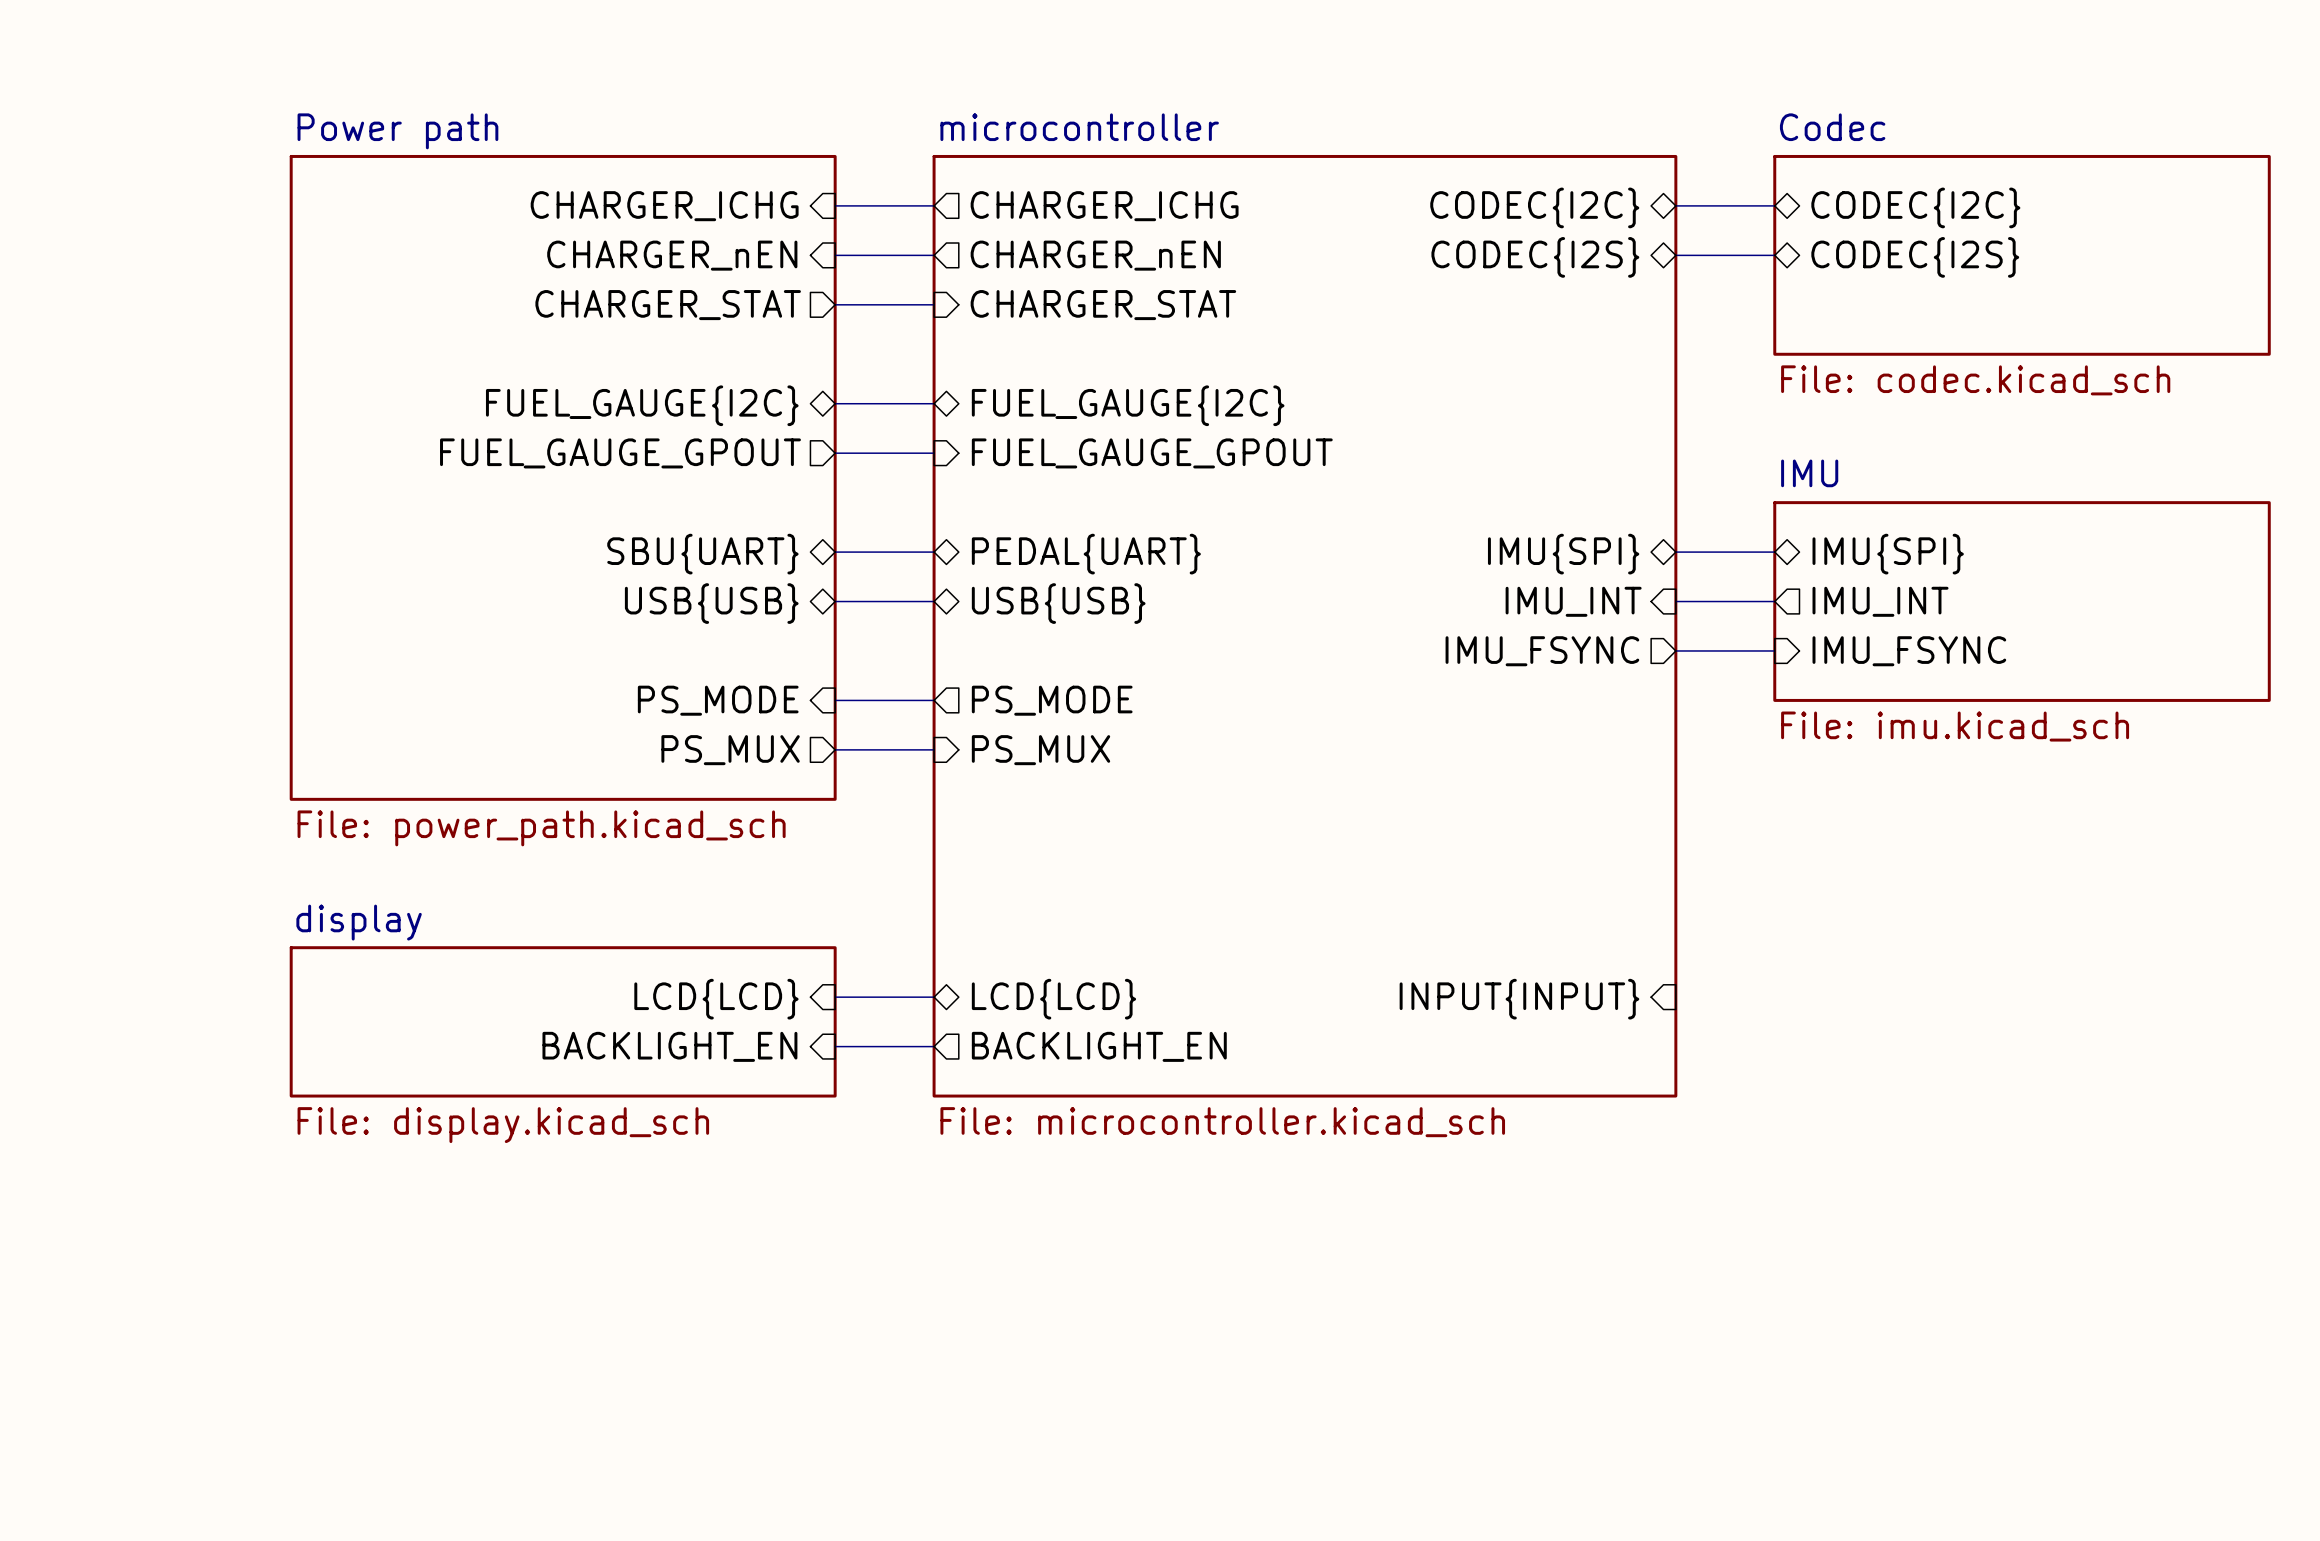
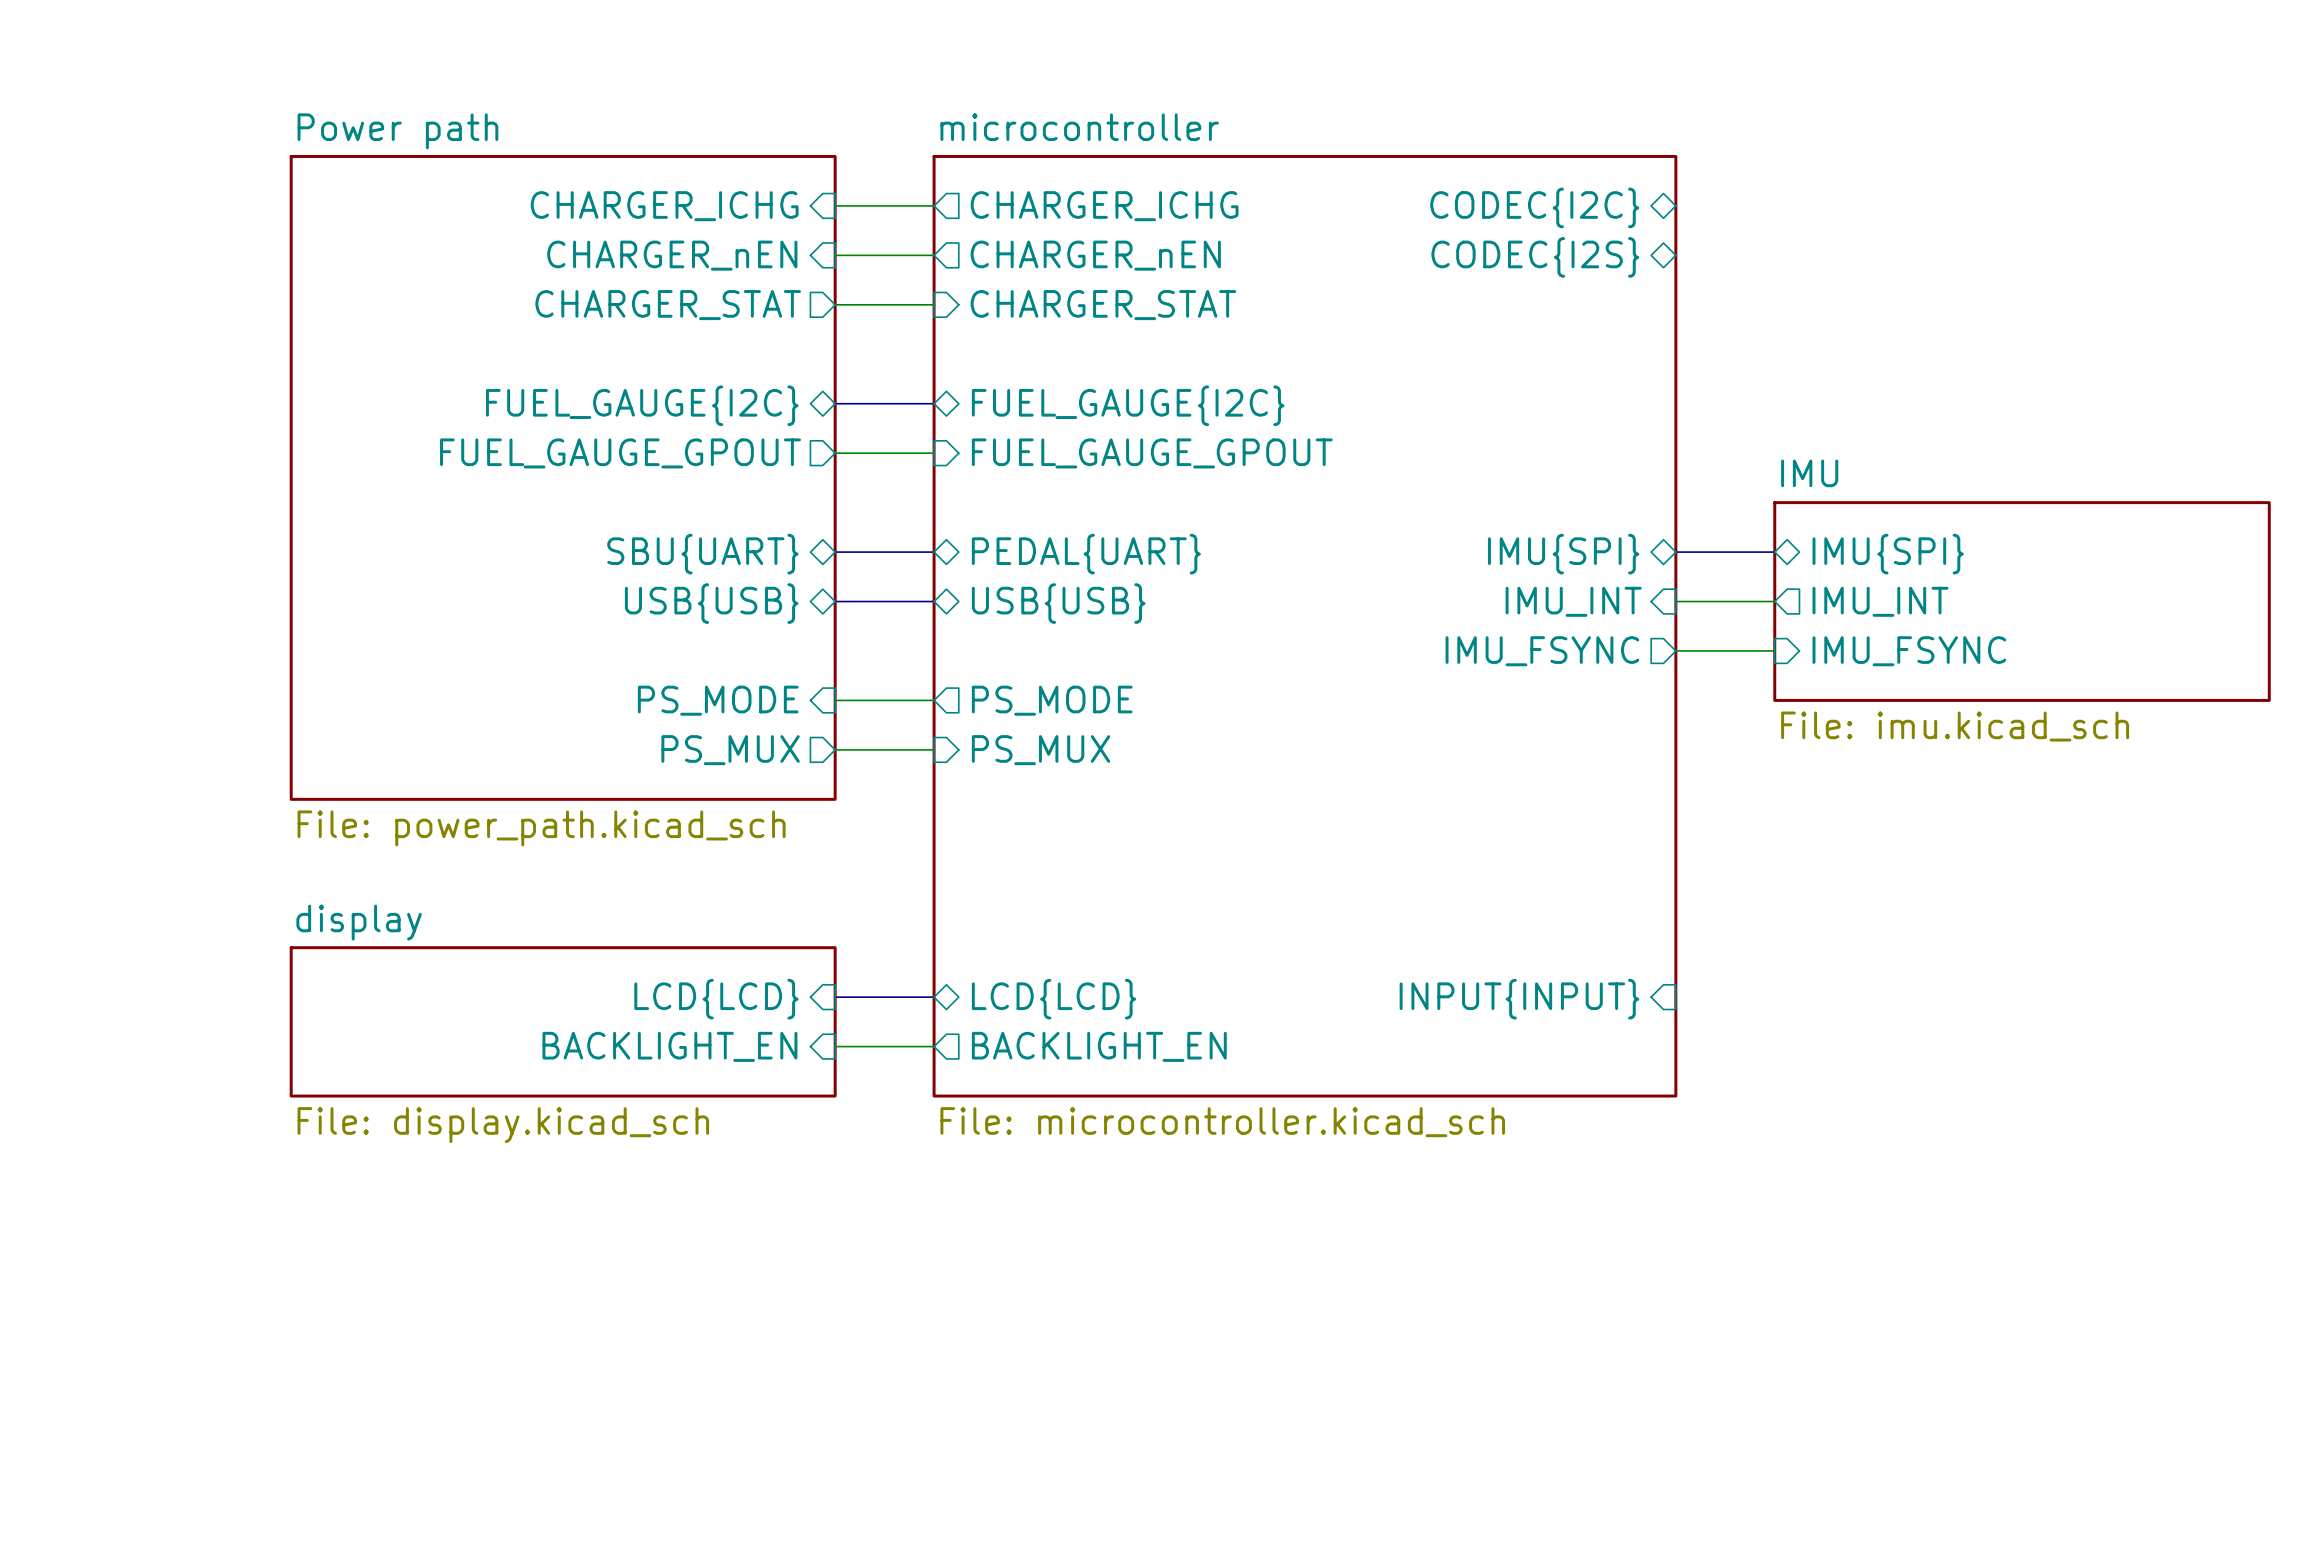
bus: (1675, 205) (1774, 205) -> none
sheet pin: CODEC{I2C} (1915, 207) -> none
bus: (1675, 255) (1774, 255) -> none
sheet Codec: File: codec.kicad_sch (2022, 255) -> none
sheet pin: CODEC{I2S} (1915, 257) -> none

